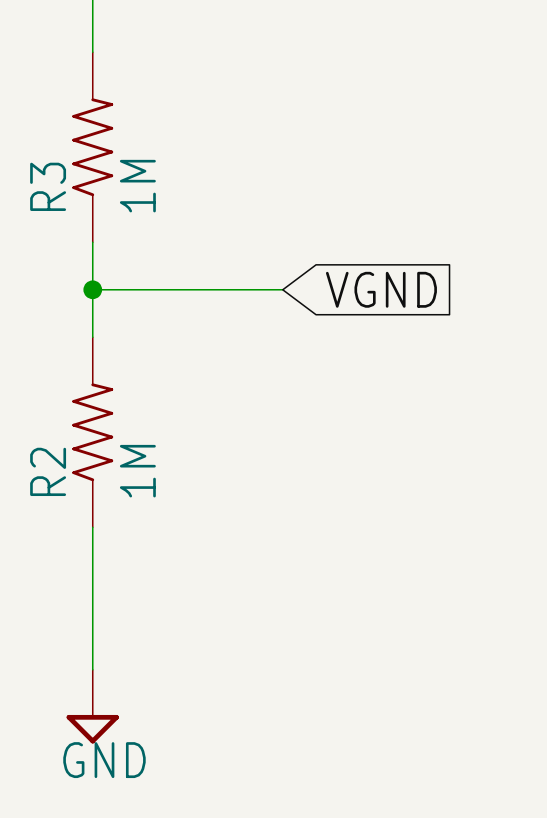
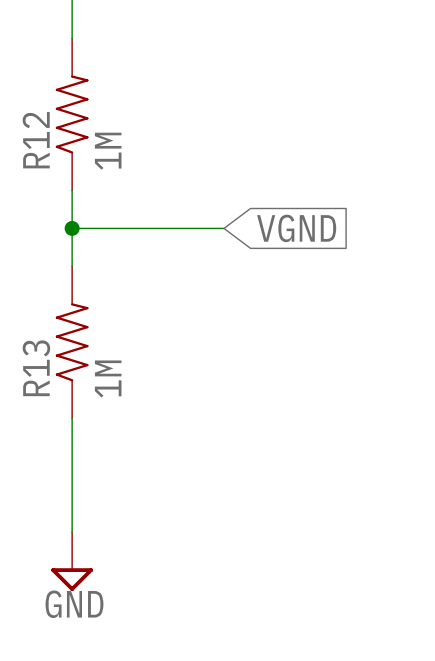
R3 name: R3 (48, 186) -> R12 (36, 140)
R2 name: R2 (48, 471) -> R13 (36, 368)

